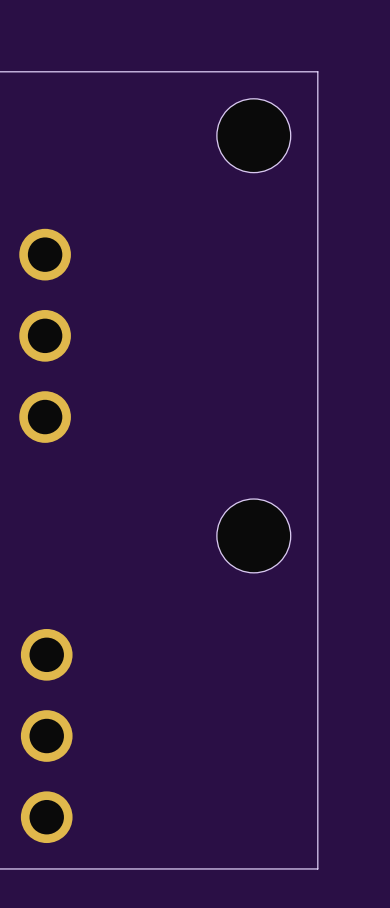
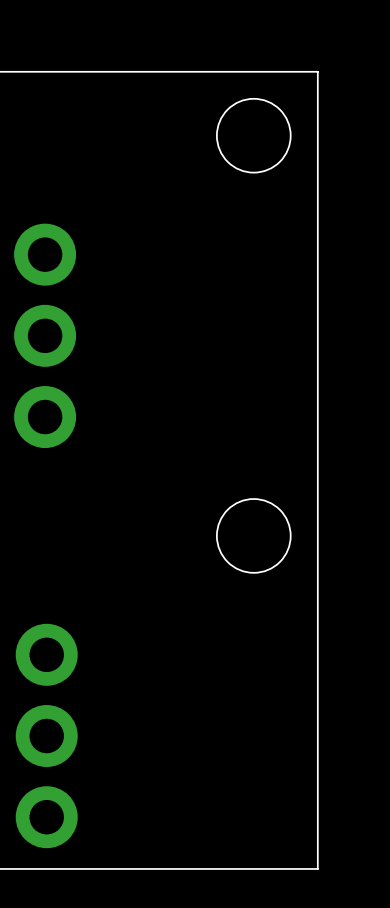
part footprint: [19, 228, 71, 443] -> [14, 223, 77, 449]
part footprint: [20, 628, 73, 844] -> [15, 623, 78, 849]

